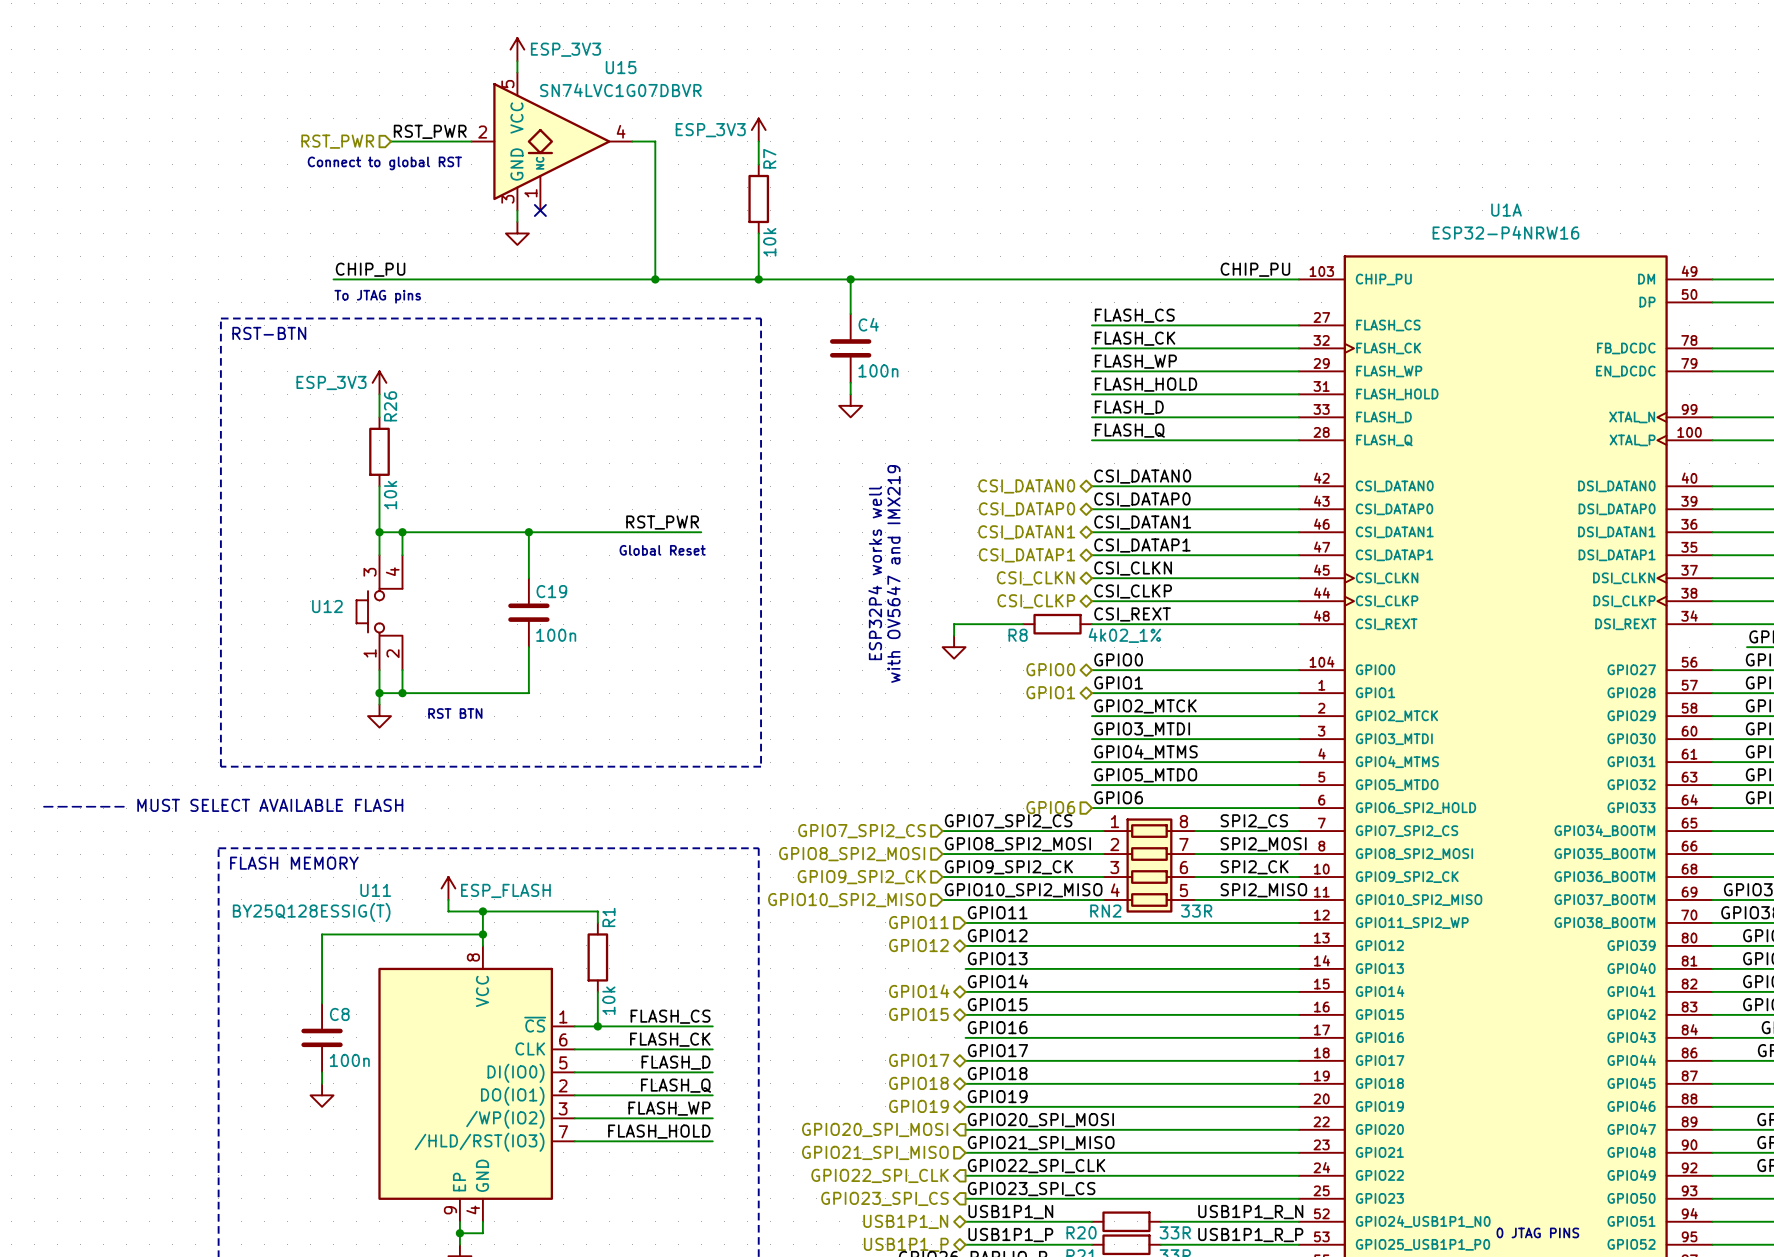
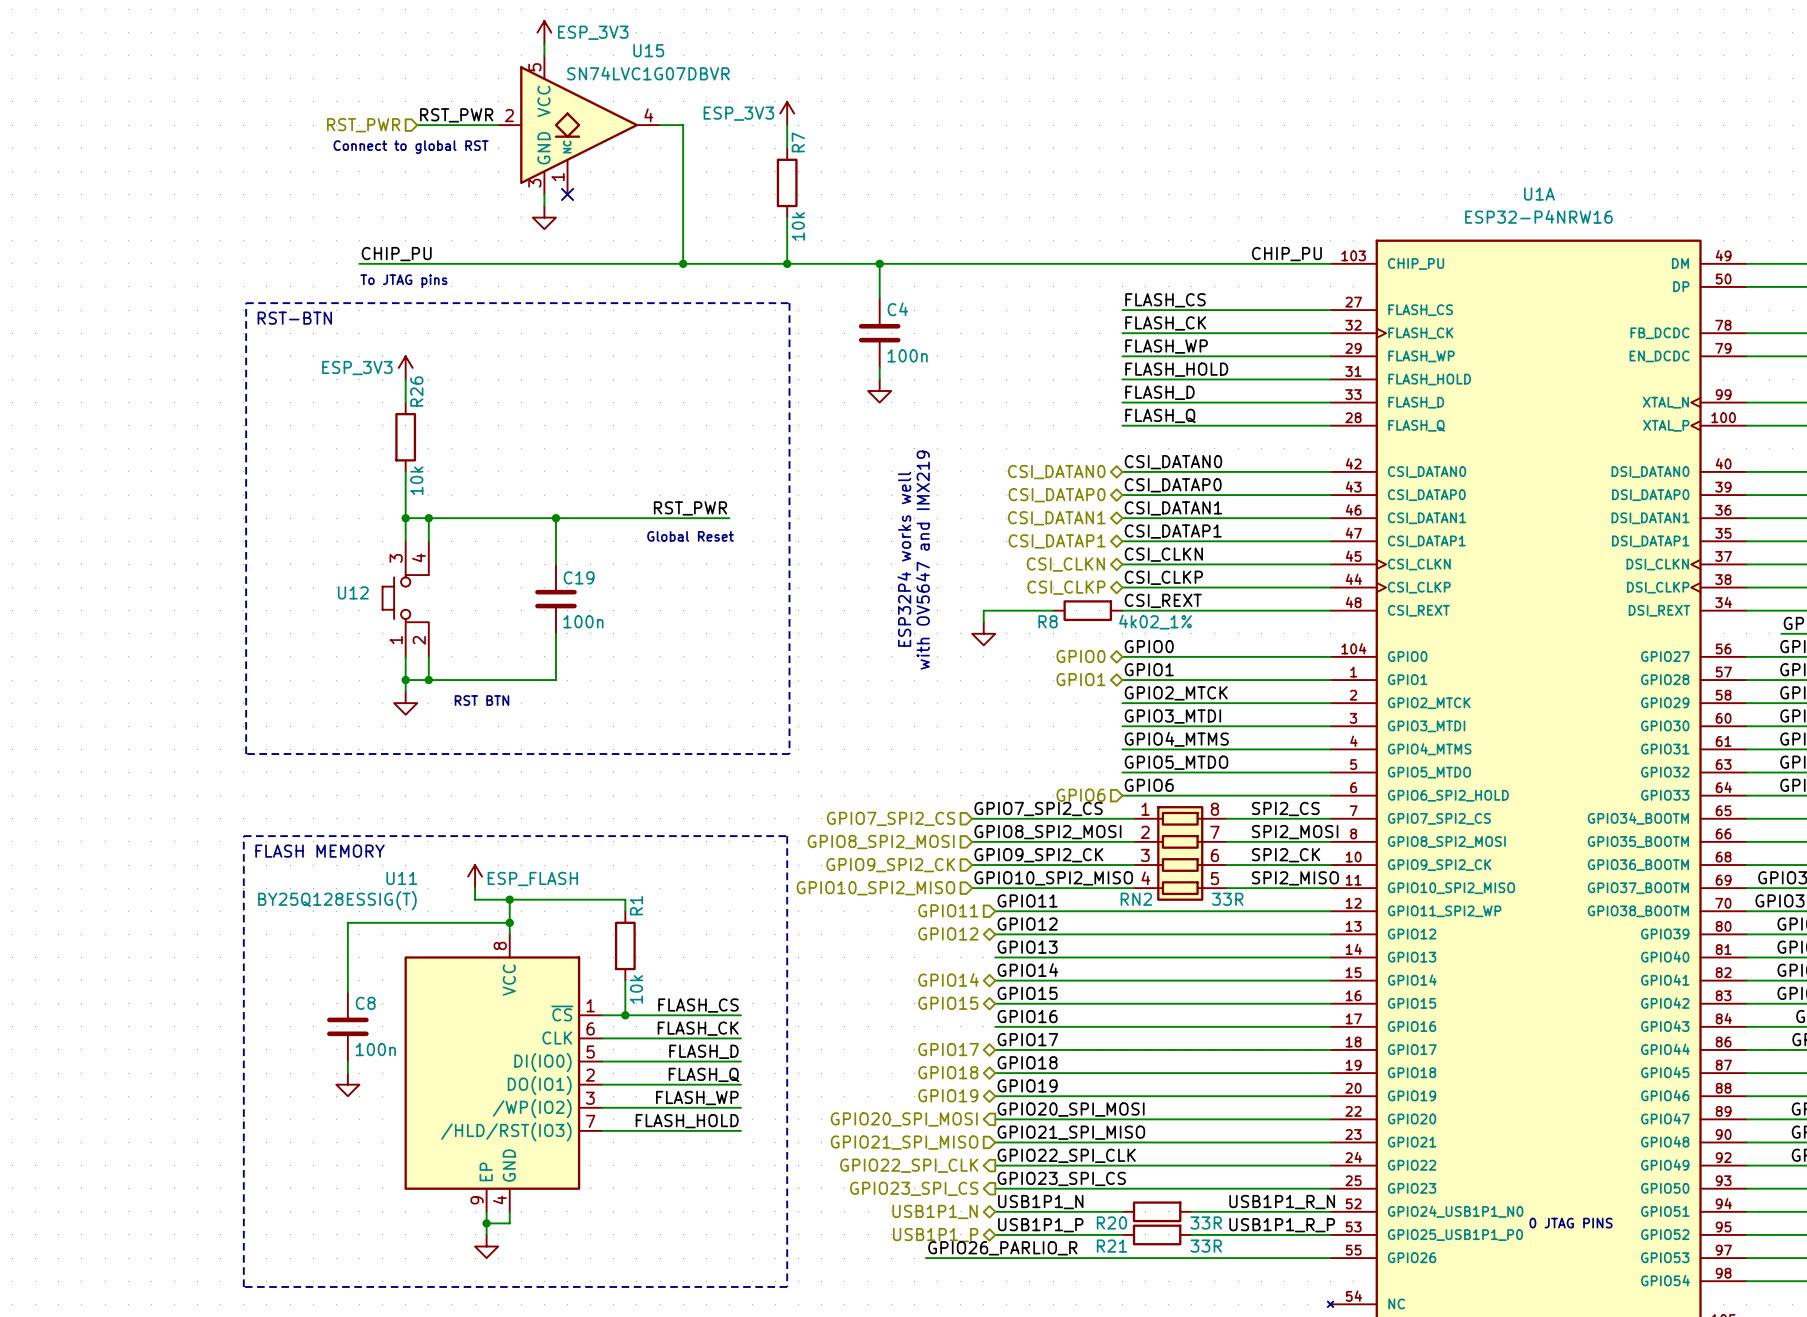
text: ------ MUST SELECT AVAILABLE FLASH (223, 805) -> none

